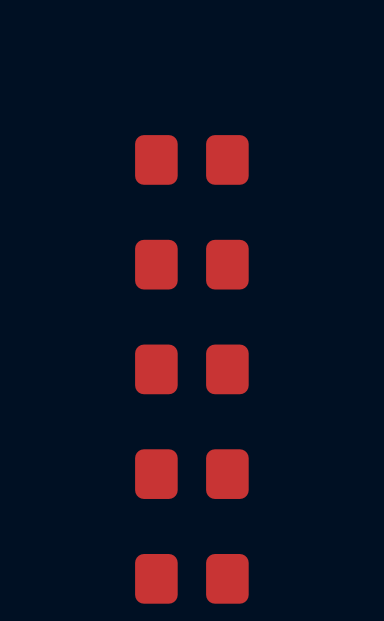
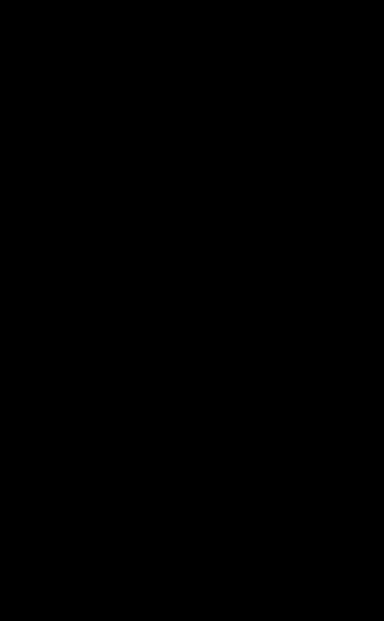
part: (191, 159) -> none
part: (191, 264) -> none
part: (191, 369) -> none
part: (191, 474) -> none
part: (191, 578) -> none

